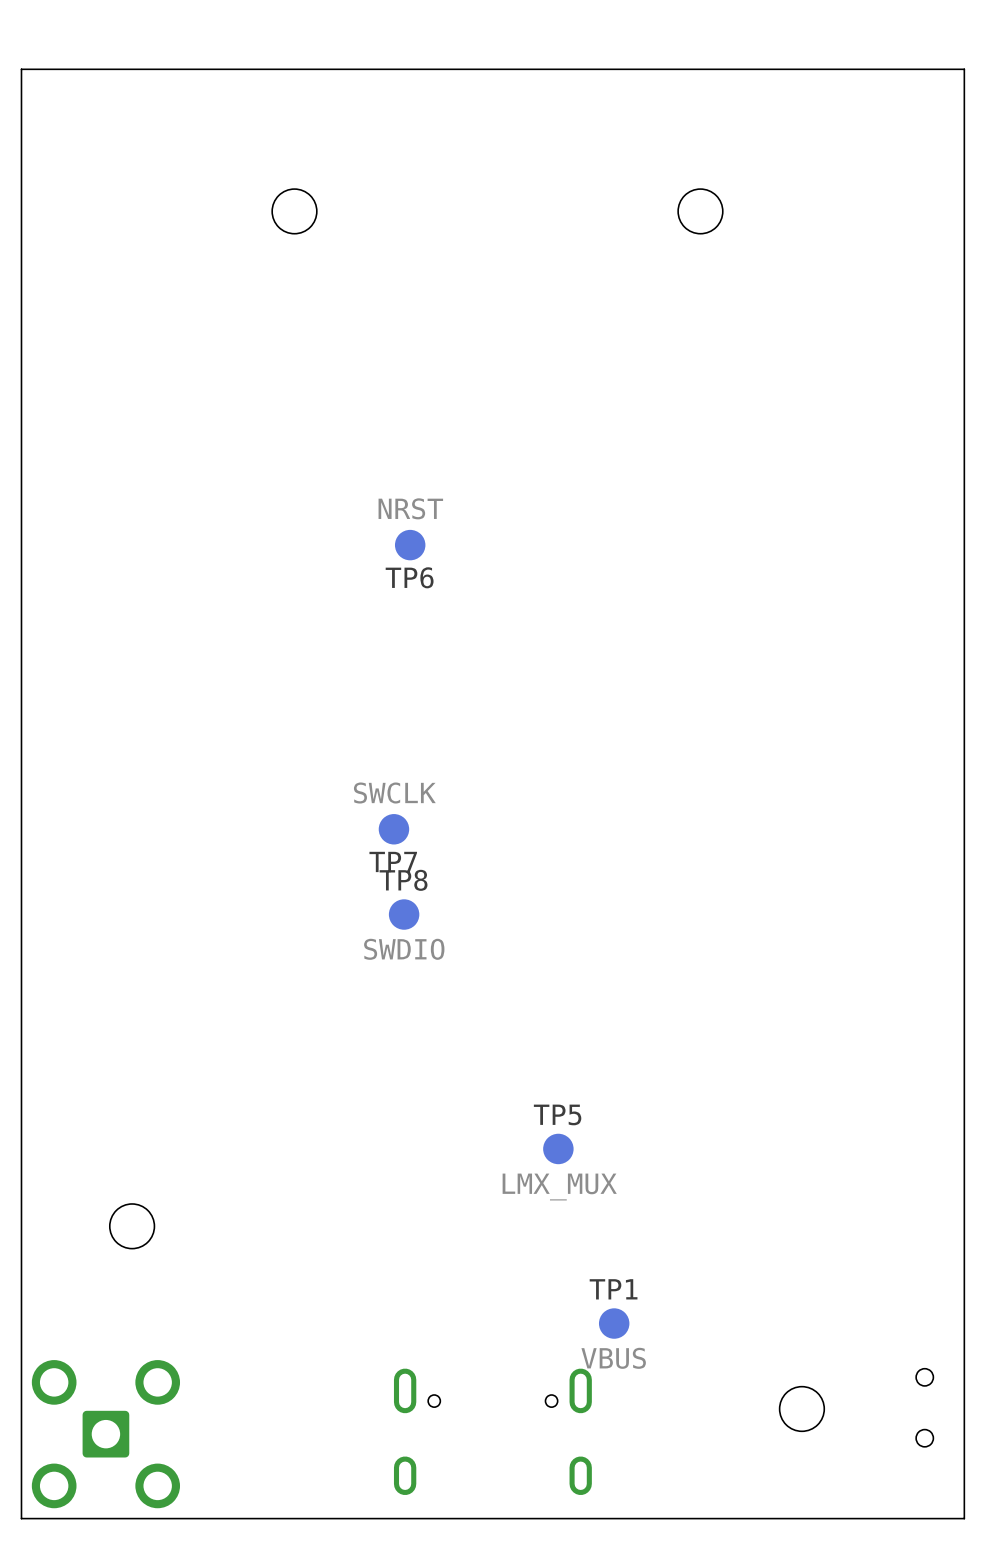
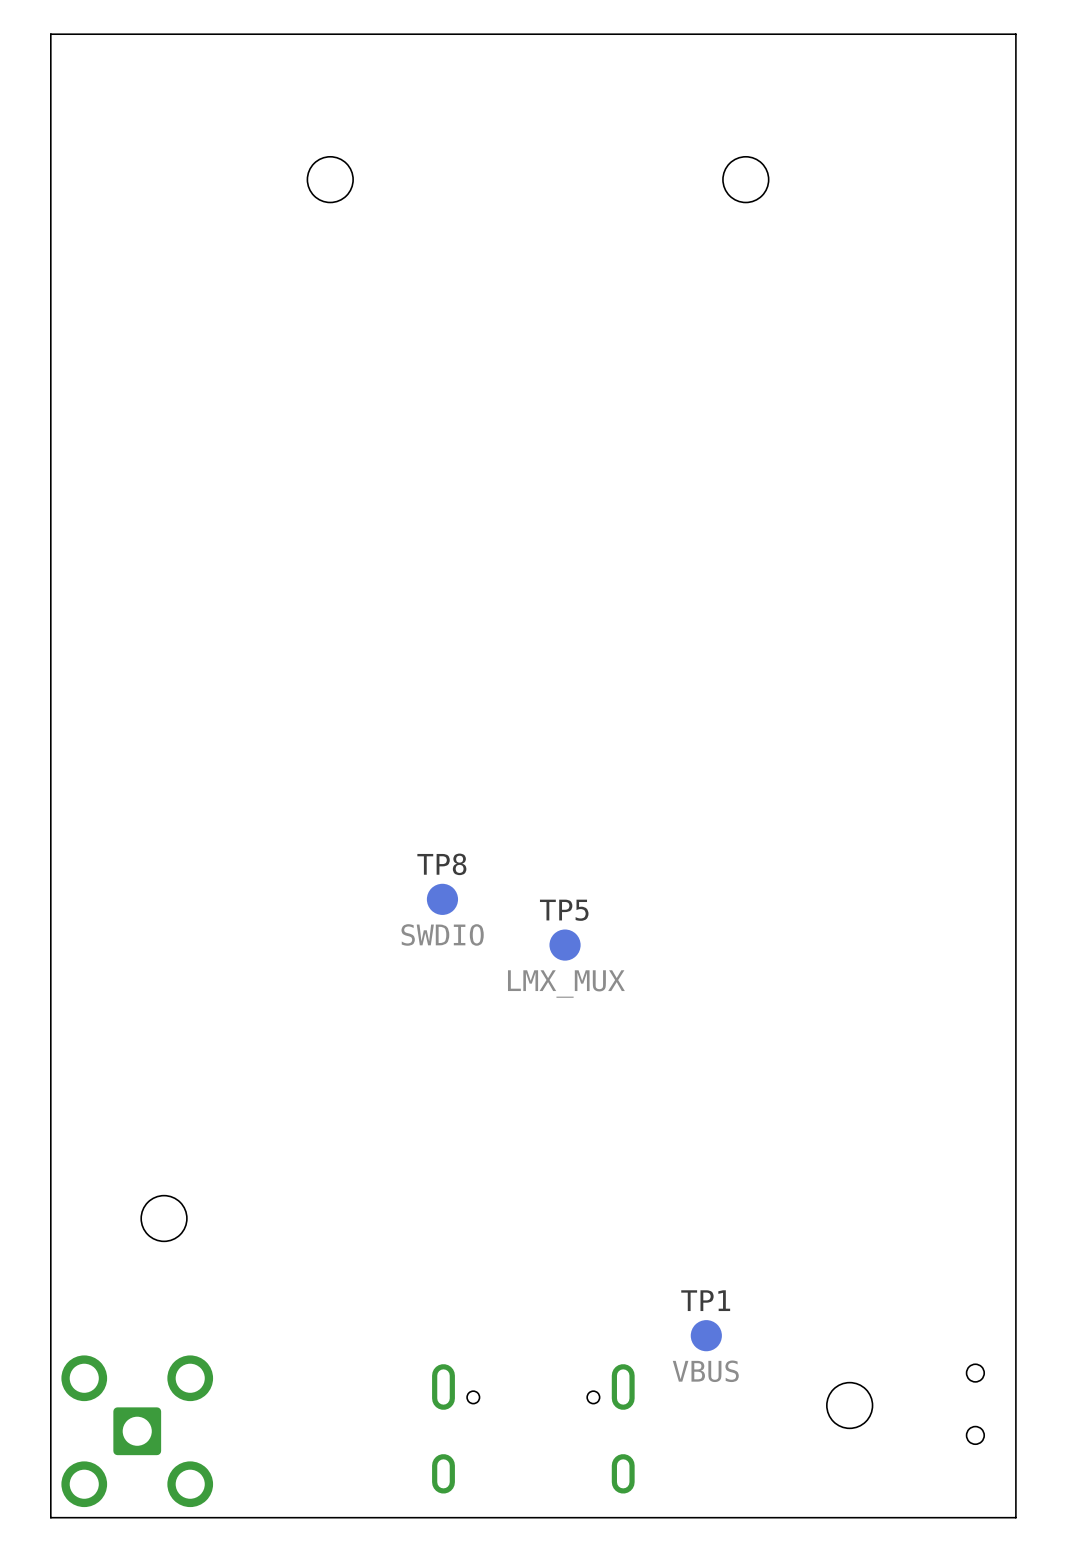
TP6: NRST (410, 545) -> none
TP7: SWCLK (393, 829) -> none
TP5 position: (558, 1148) -> (565, 945)
TP1 position: (614, 1323) -> (706, 1335)

